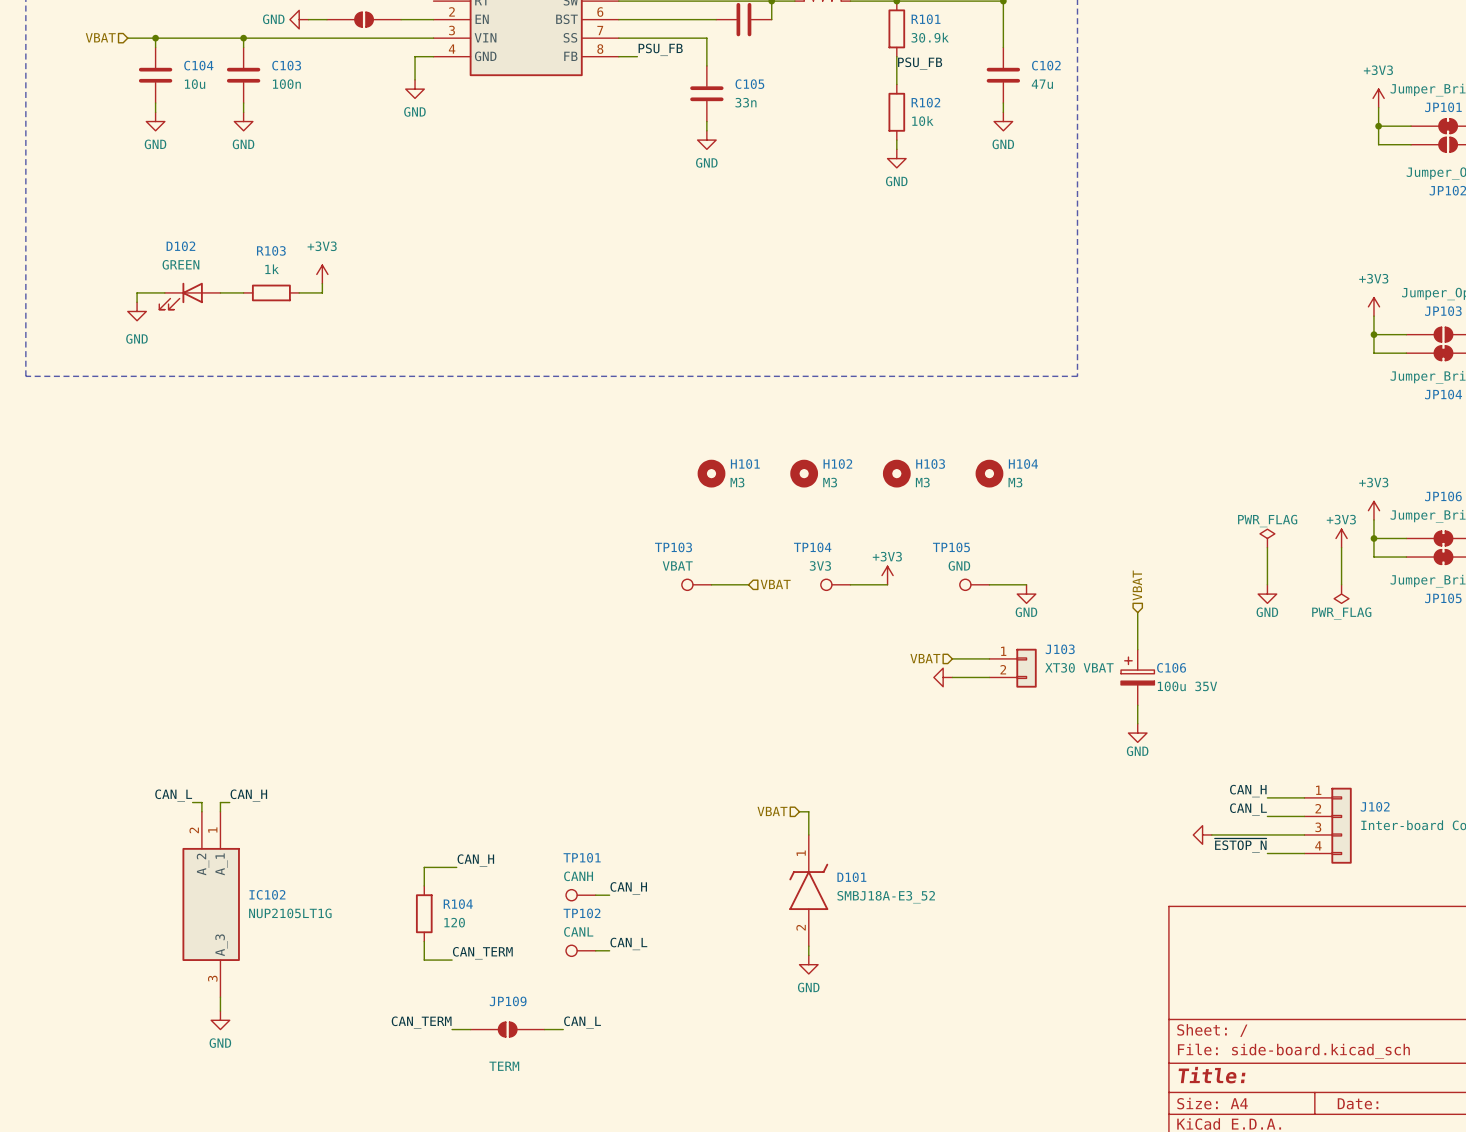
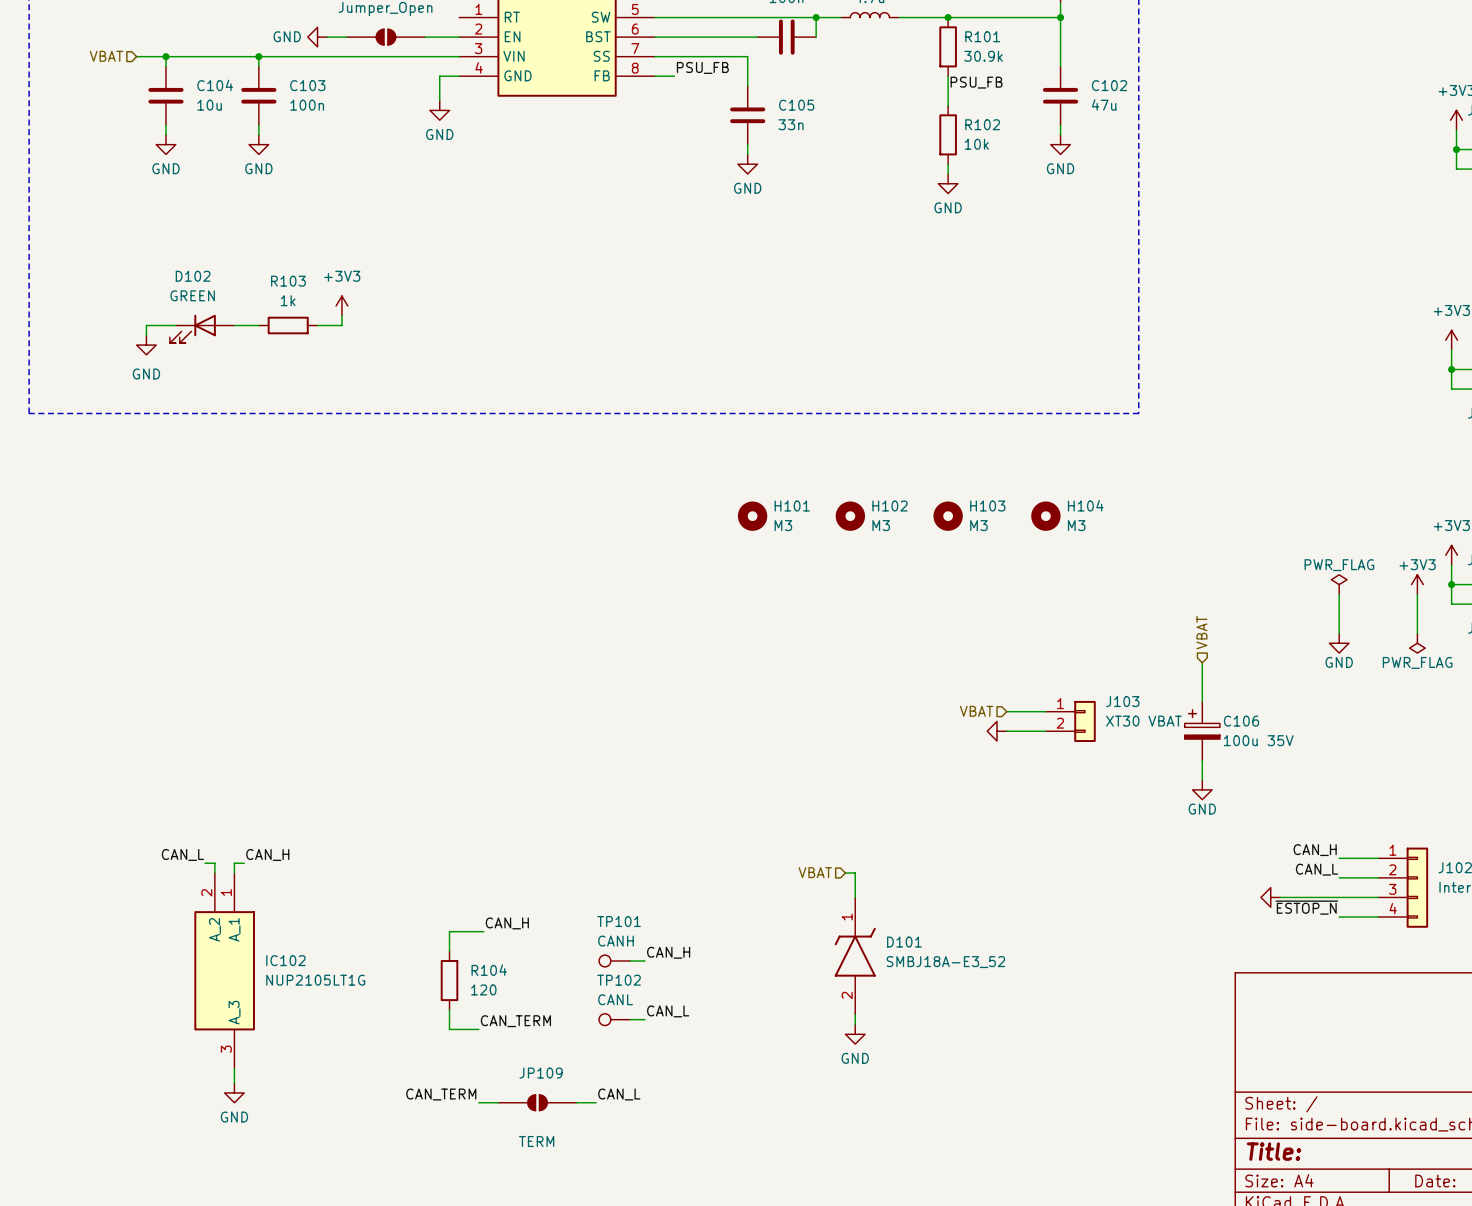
power symbol: +3V3 (887, 575) -> none
TP103: VBAT (696, 584) -> none
wire: (711, 584) (748, 584) -> none
hierarchical label: VBAT (775, 584) -> none
TP104: 3V3 (835, 584) -> none
wire: (850, 584) (887, 584) -> none
TP105: GND (974, 584) -> none
wire: (989, 584) (1026, 584) -> none
power symbol: GND (1026, 594) -> none

